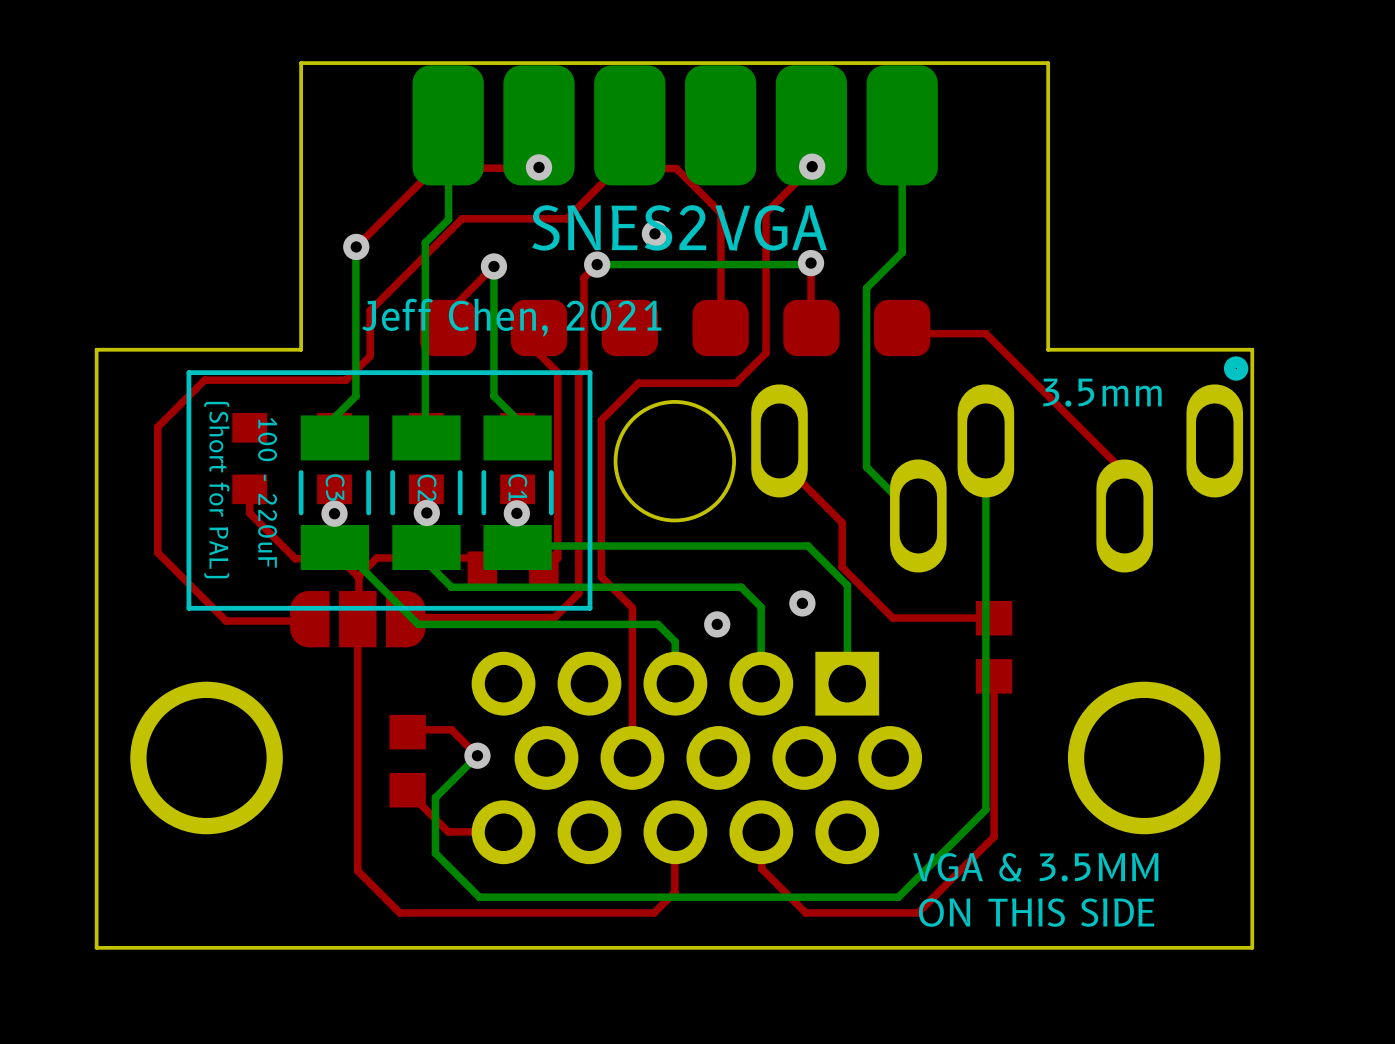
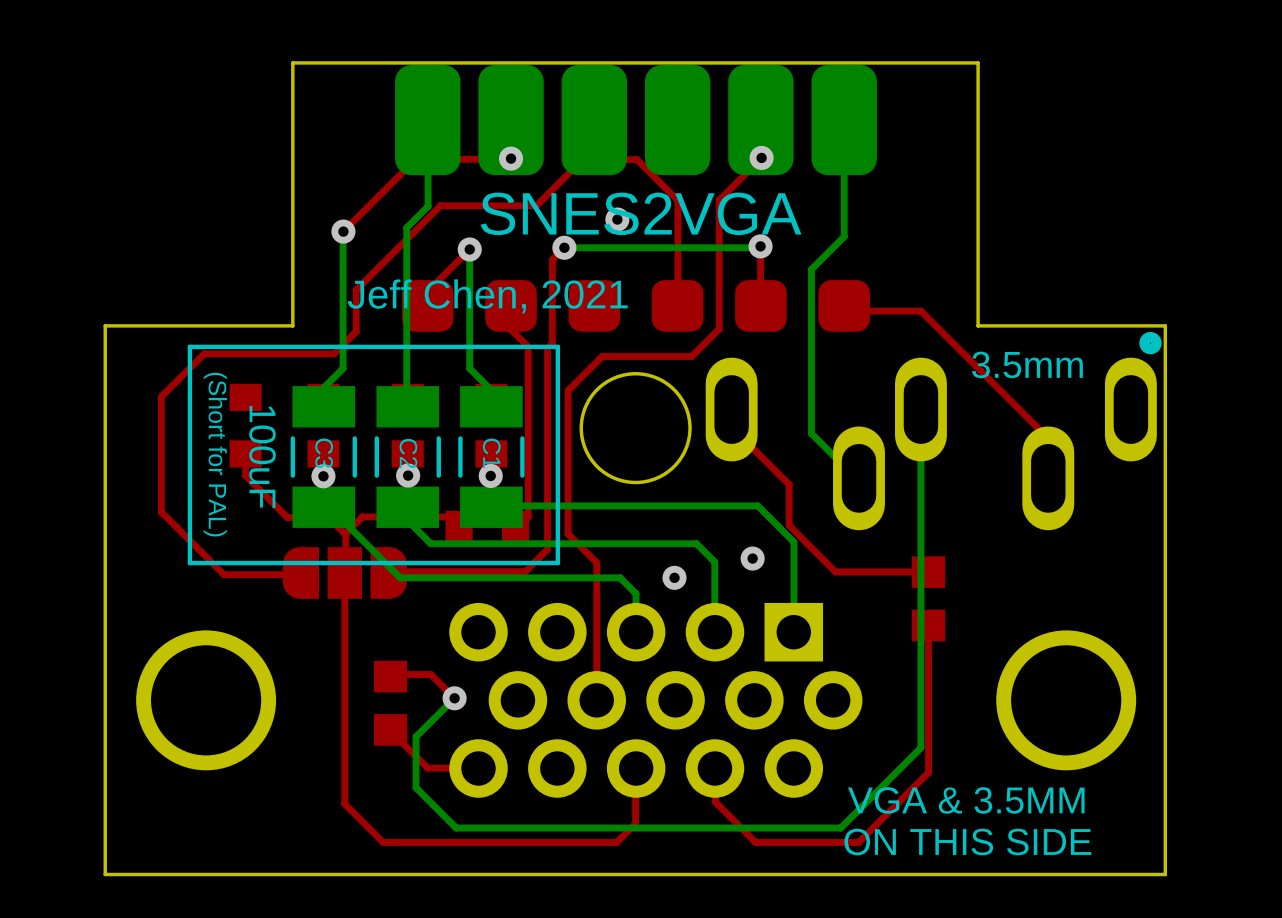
text: 100 - 220uF (267, 492) -> 100uF (262, 457)

